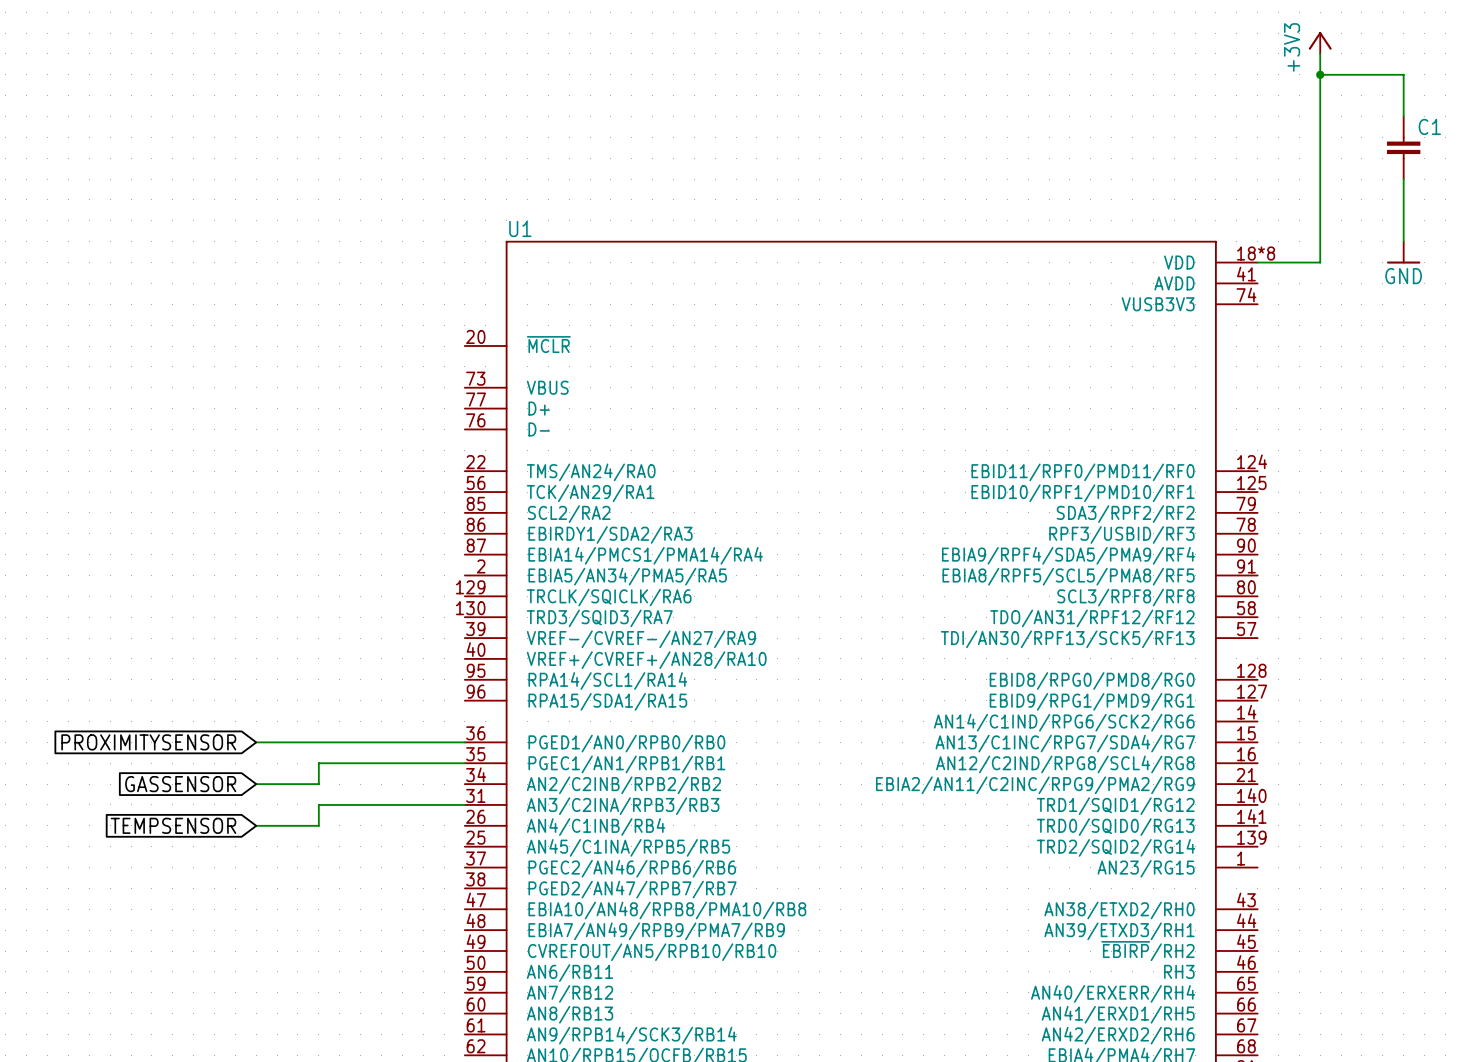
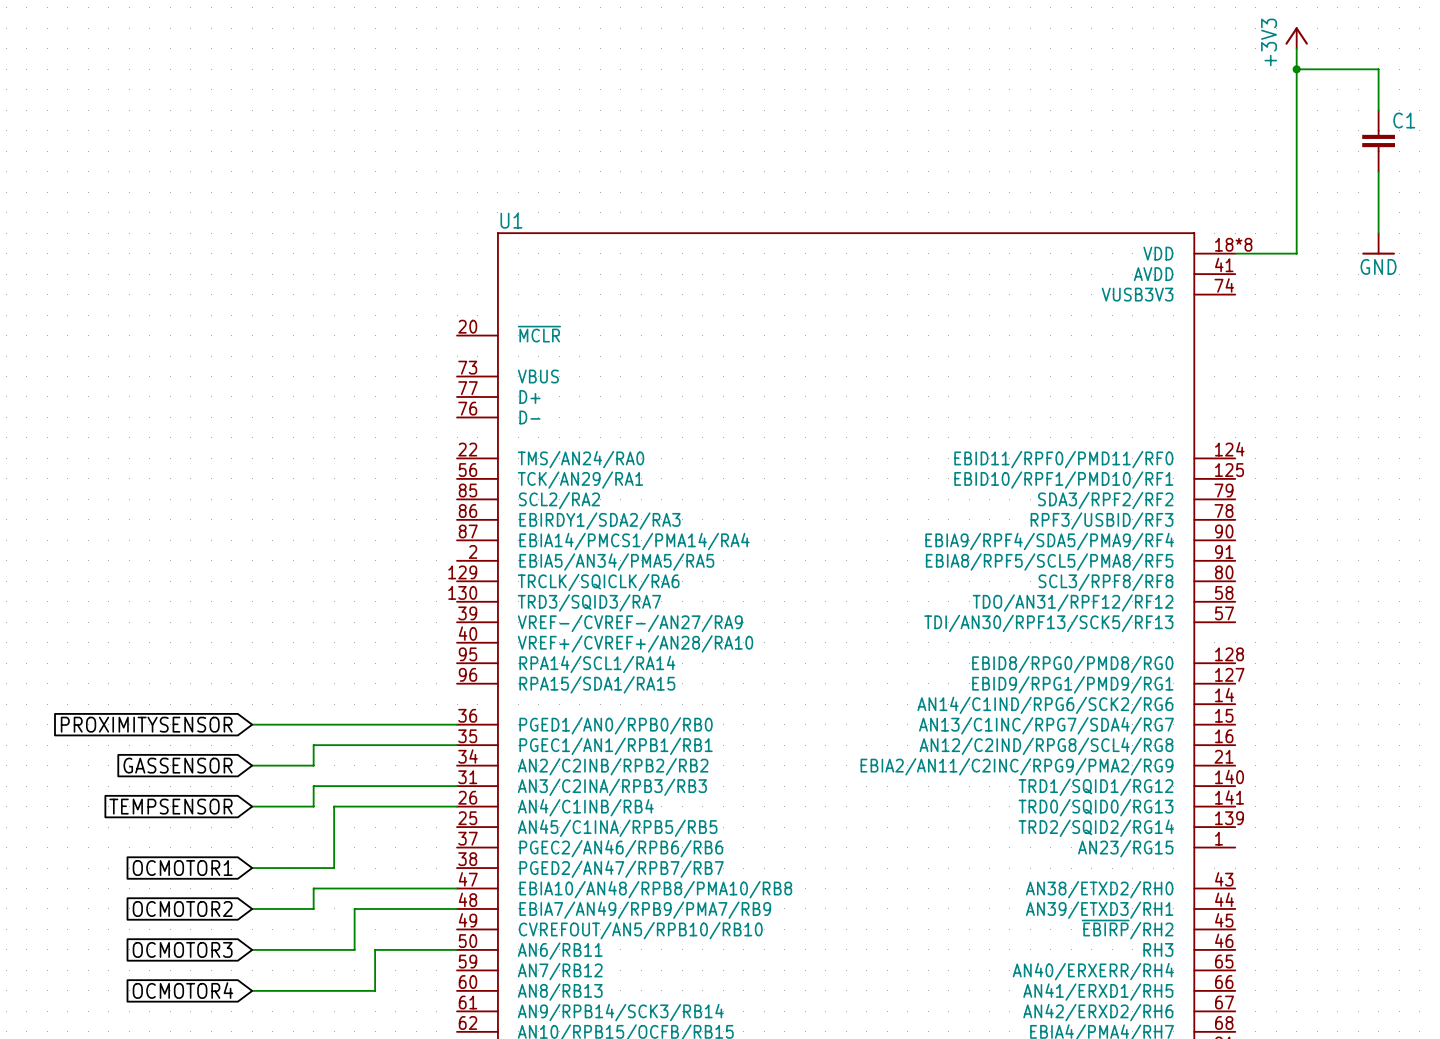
wire: none -> (457, 806) (334, 806) (334, 868) (252, 868)
global label: none -> OCMOTOR1 (182, 868)
wire: none -> (457, 888) (313, 888) (313, 908) (252, 908)
global label: none -> OCMOTOR2 (182, 908)
wire: none -> (457, 908) (354, 908) (354, 949) (252, 949)
global label: none -> OCMOTOR3 (182, 949)
wire: none -> (457, 949) (375, 949) (375, 990) (252, 990)
global label: none -> OCMOTOR4 (182, 990)

